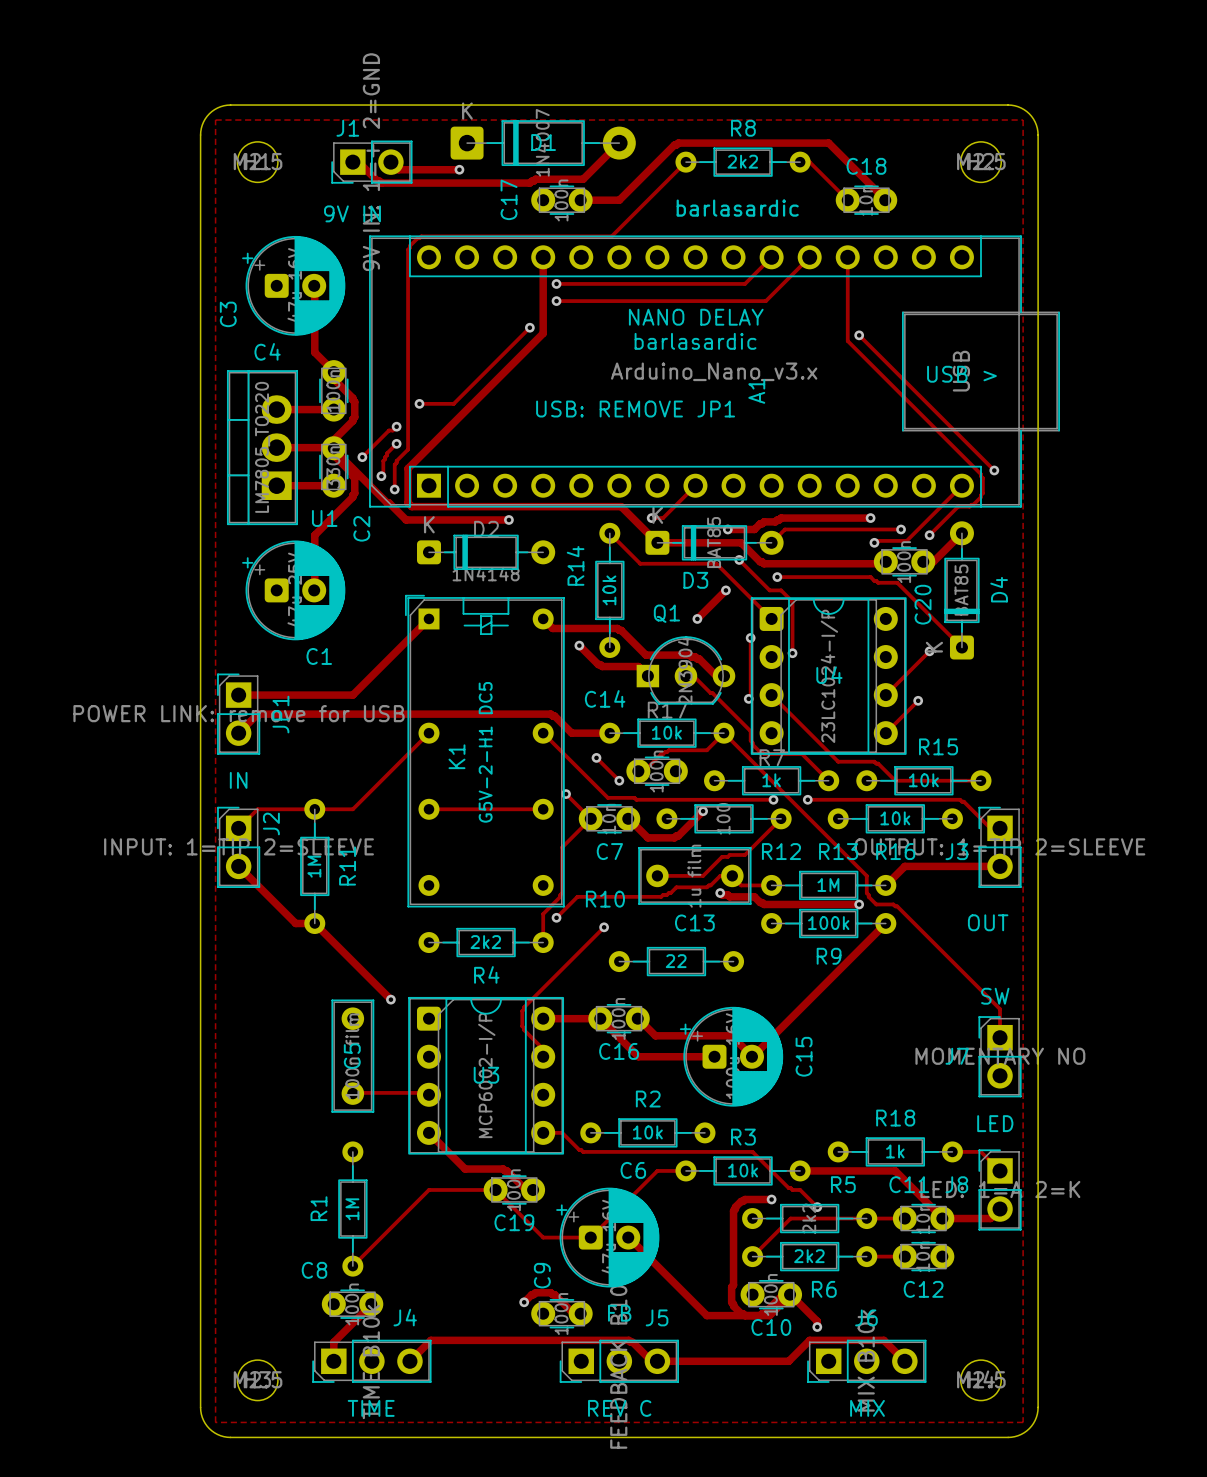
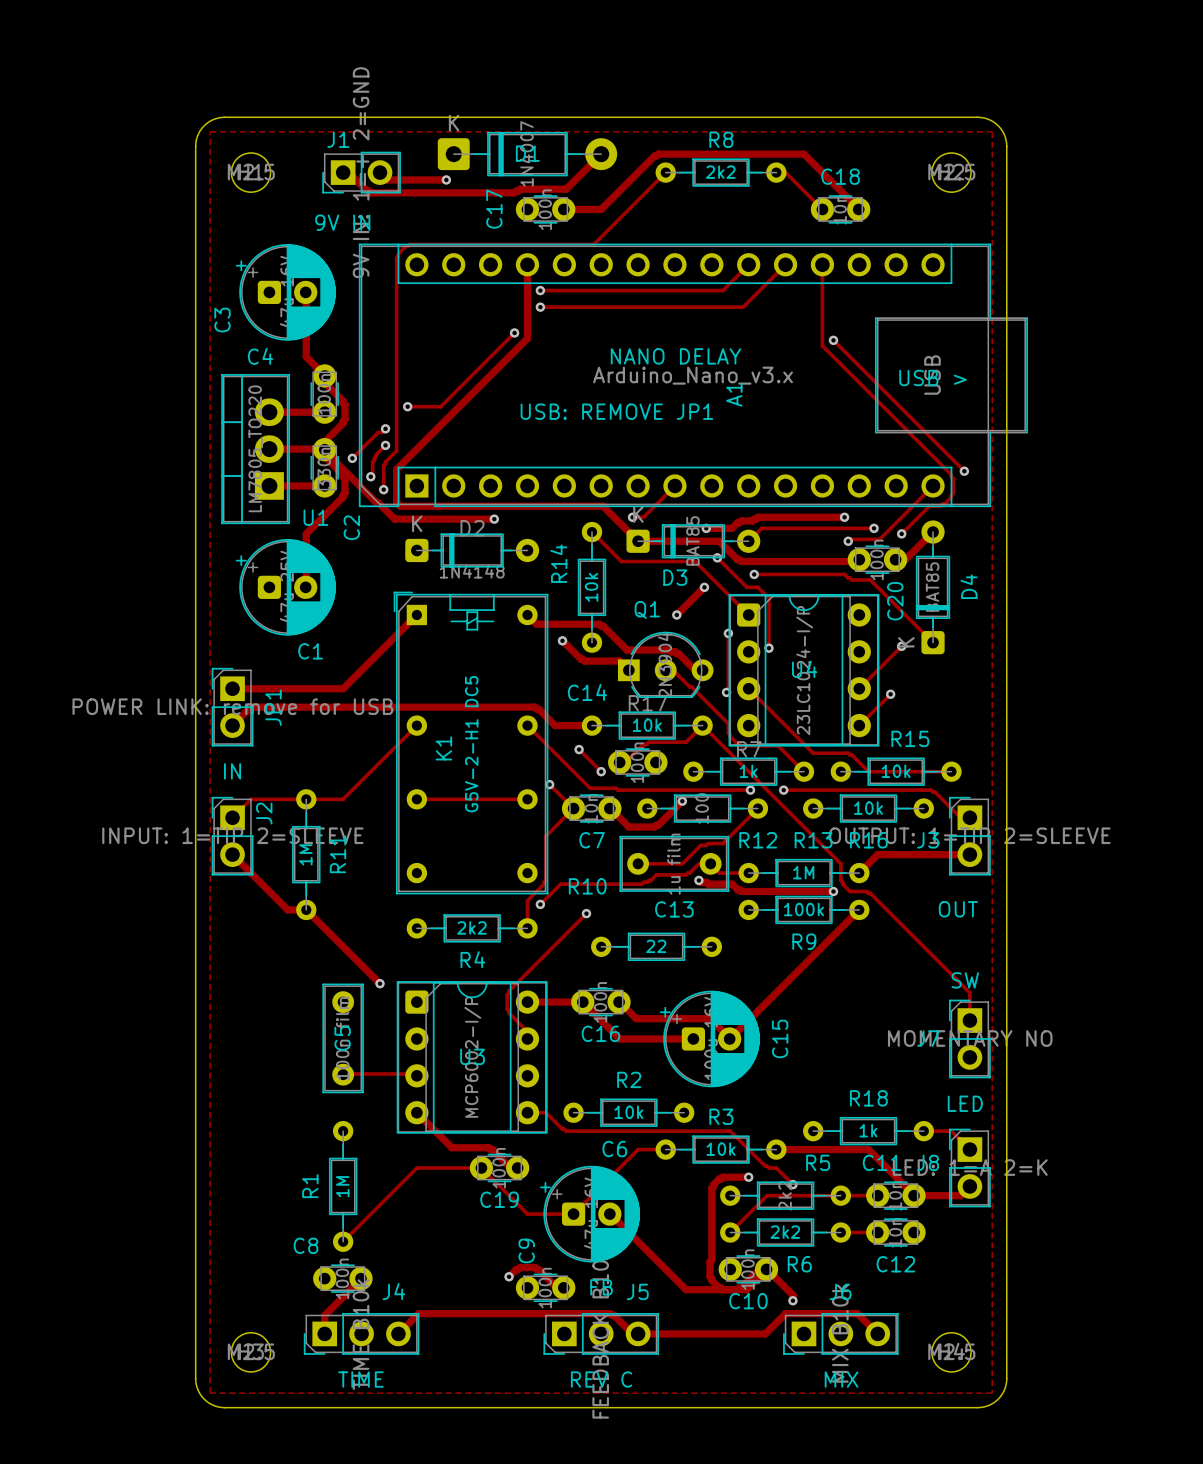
text: barlasardic (737, 208) -> none
text: NANO DELAY (696, 317) -> none
text: barlasardic (695, 341) -> NANO DELAY (675, 356)

